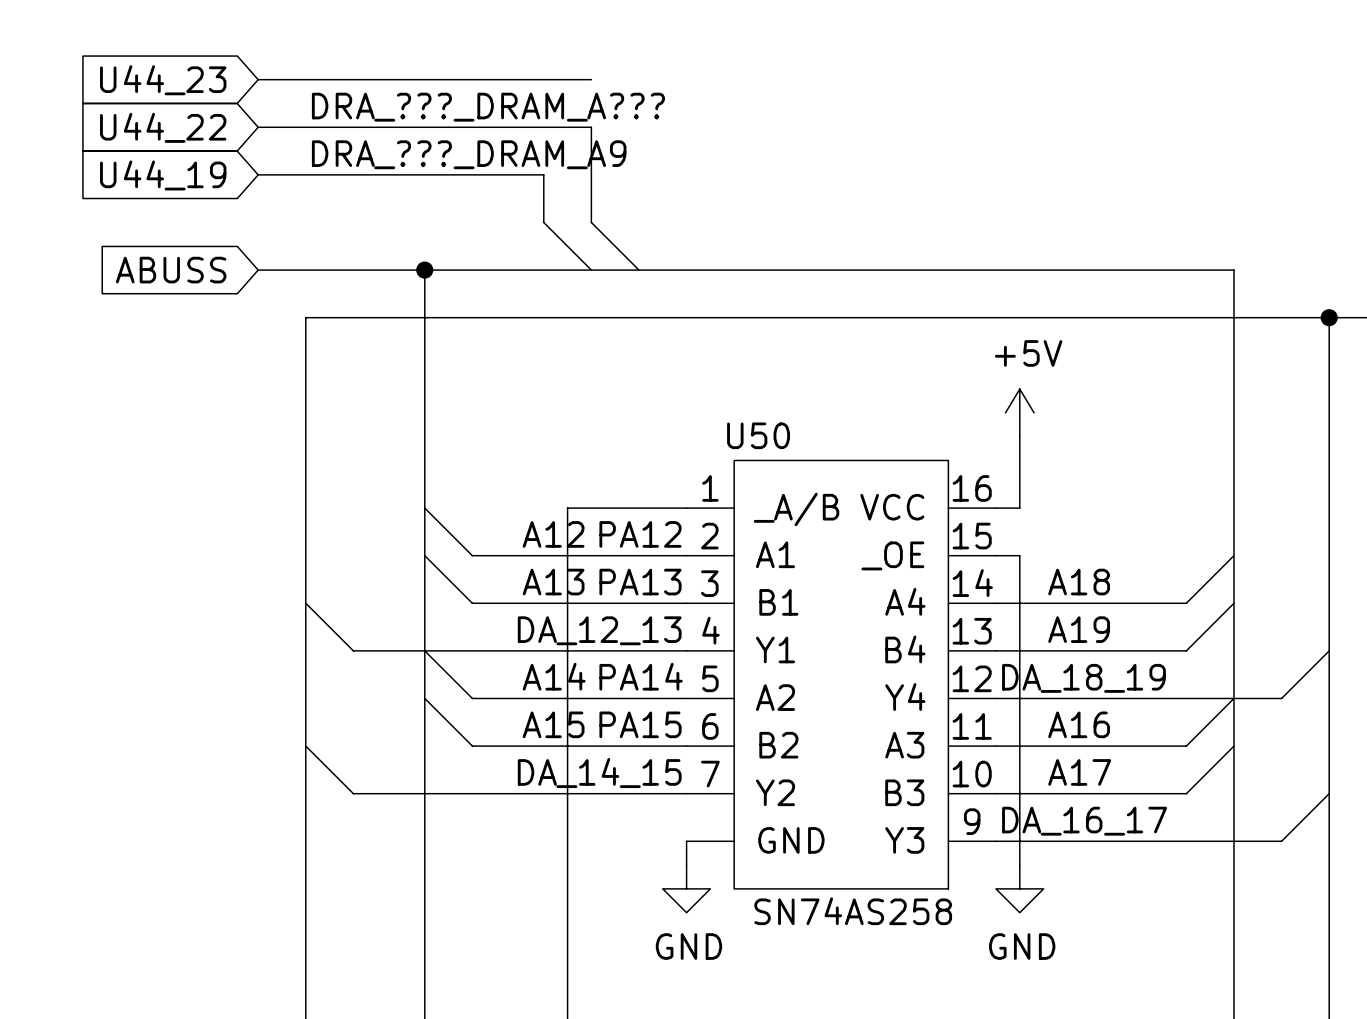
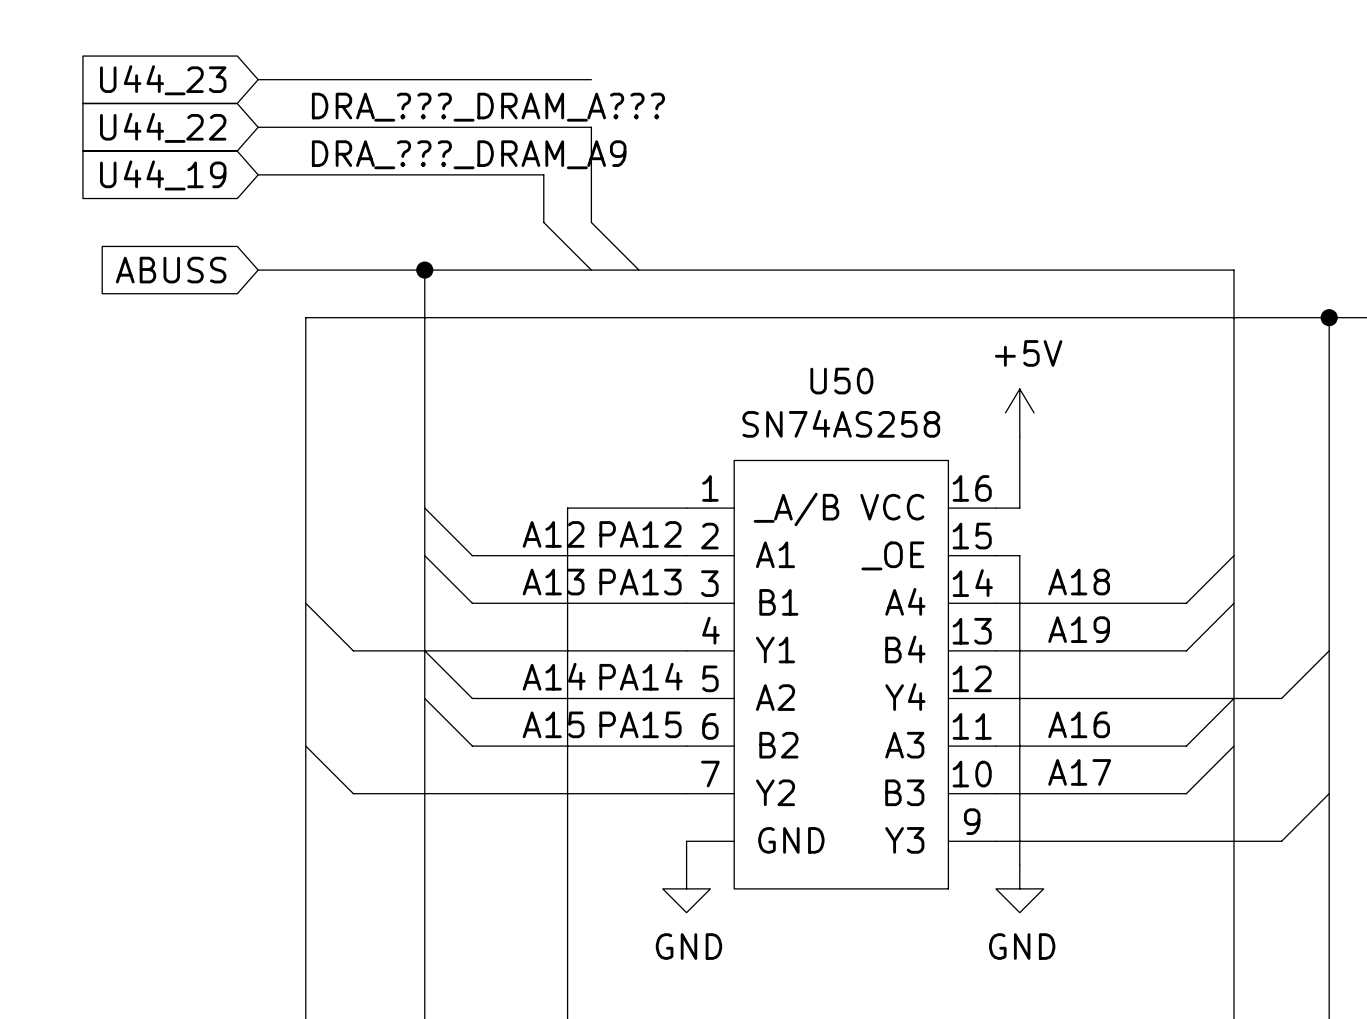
U50 name position: U50 (758, 435) -> U50 (841, 381)
label: DA_12_13 (599, 630) -> none
label: DA_18_19 (1084, 678) -> none
label: DA_14_15 (599, 773) -> none
label: DA_16_17 (1084, 821) -> none
U50 value position: SN74AS258 (853, 911) -> SN74AS258 (841, 423)

